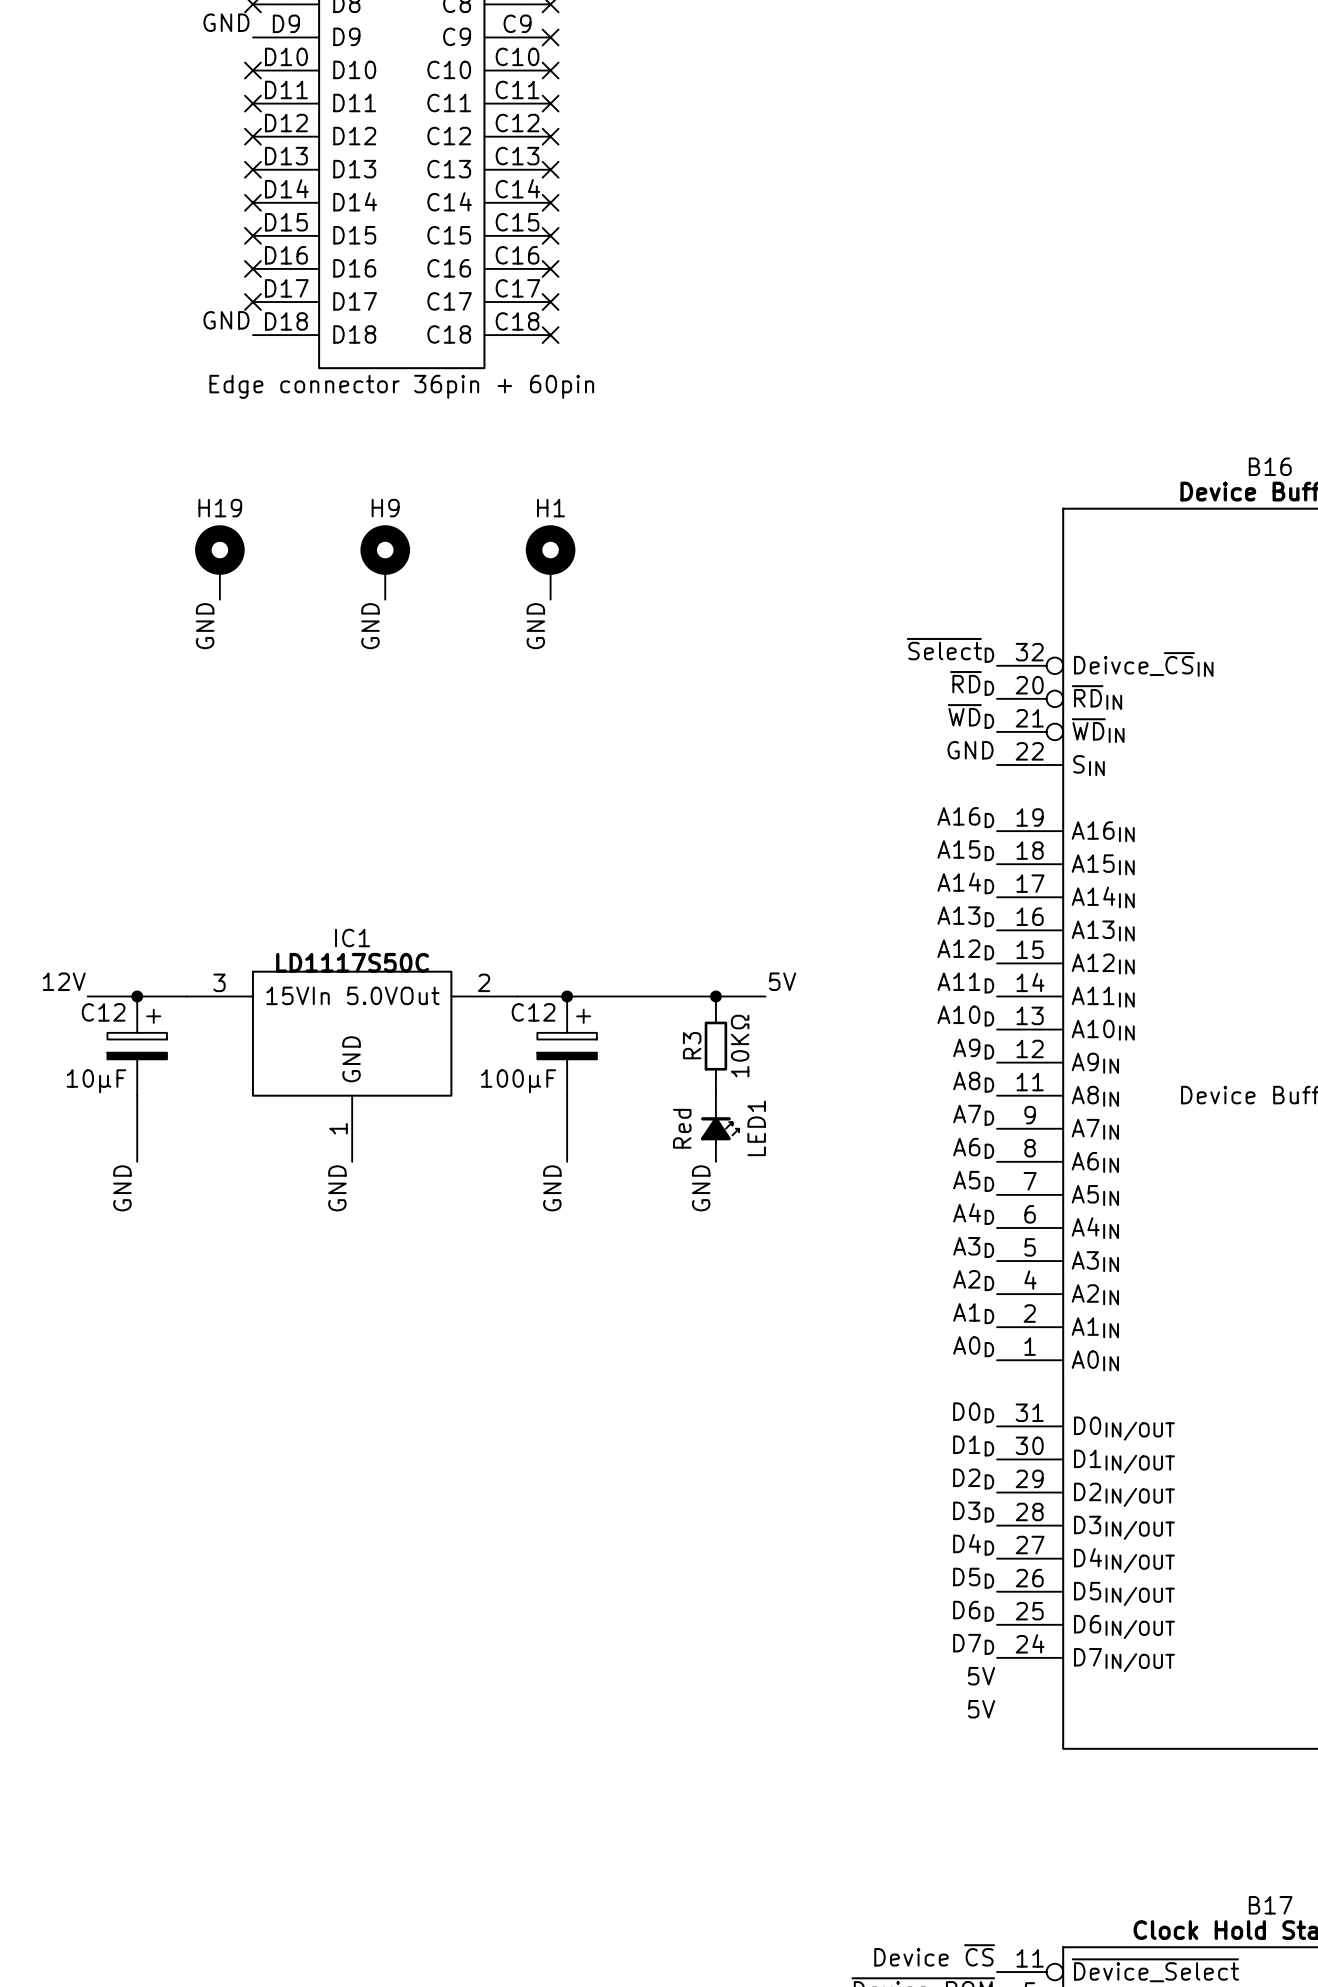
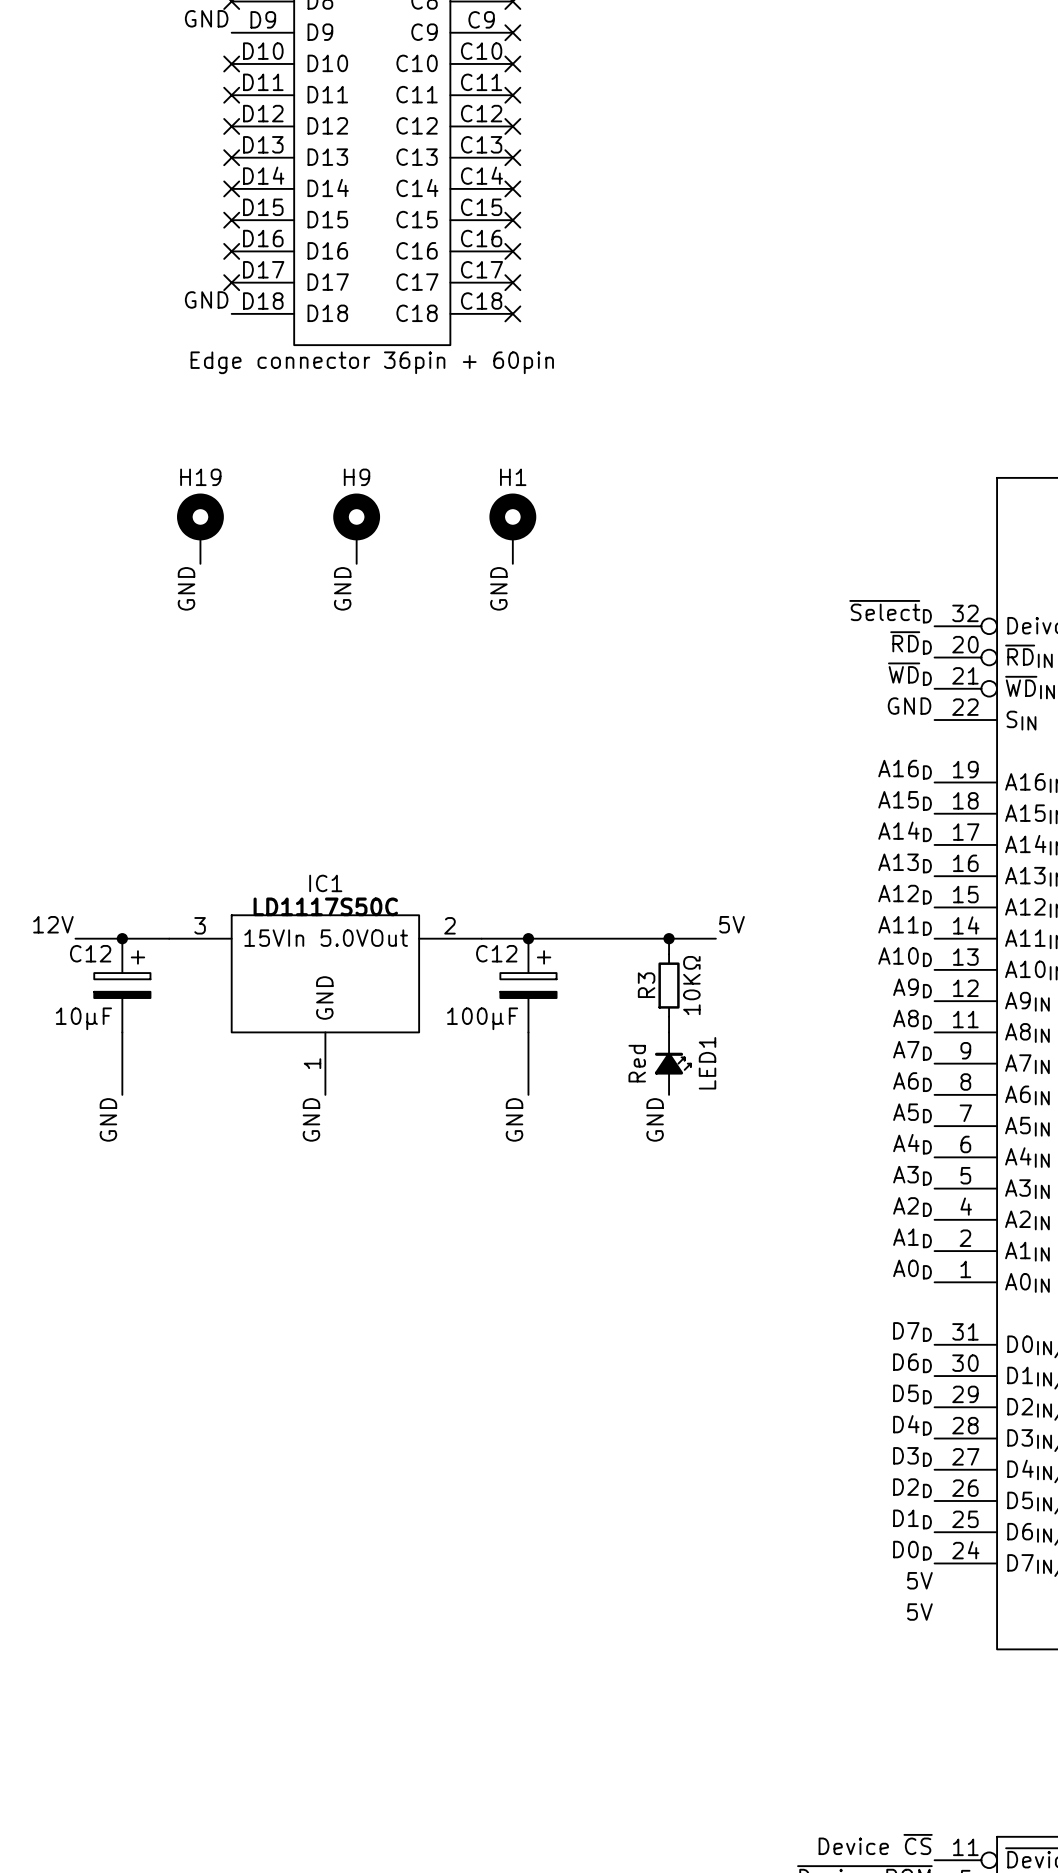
label: D0D (973, 1412) -> D7D (912, 1332)
label: D1D (973, 1445) -> D6D (912, 1363)
label: D2D (973, 1479) -> D5D (912, 1394)
label: D3D (973, 1512) -> D4D (912, 1425)
label: D4D (973, 1544) -> D3D (912, 1456)
label: D5D (973, 1578) -> D2D (912, 1488)
label: D6D (973, 1611) -> D1D (912, 1519)
label: D7D (973, 1644) -> D0D (912, 1550)

